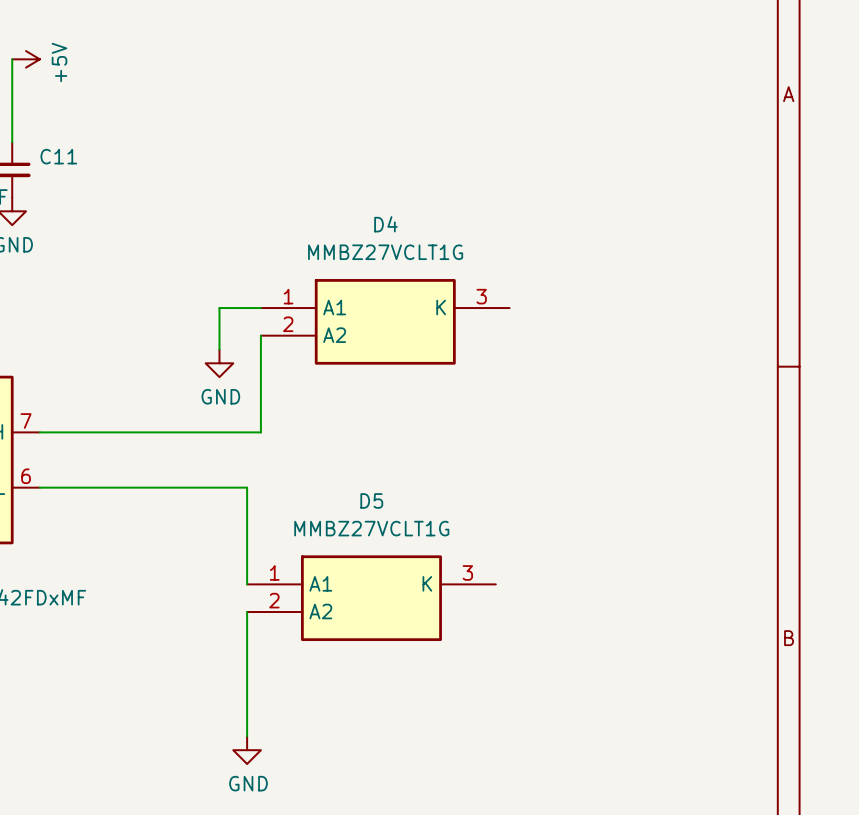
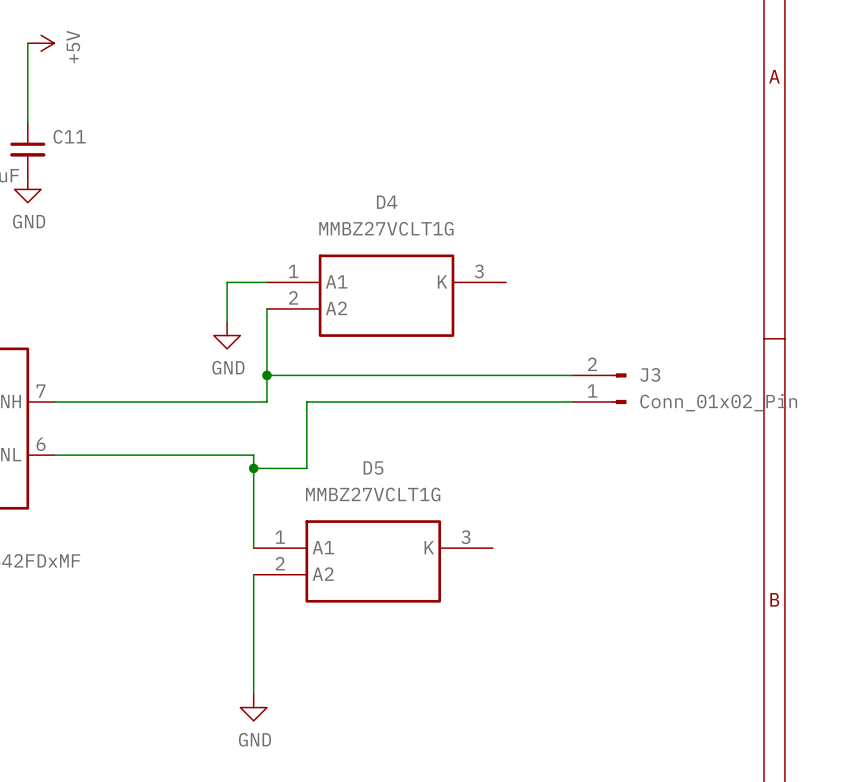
wire: none -> (266, 375) (572, 375)
junction: none -> (266, 375)
J3: none -> Conn_01x02_Pin (599, 388)
wire: none -> (572, 401) (306, 401) (306, 468) (253, 468)
junction: none -> (253, 468)

